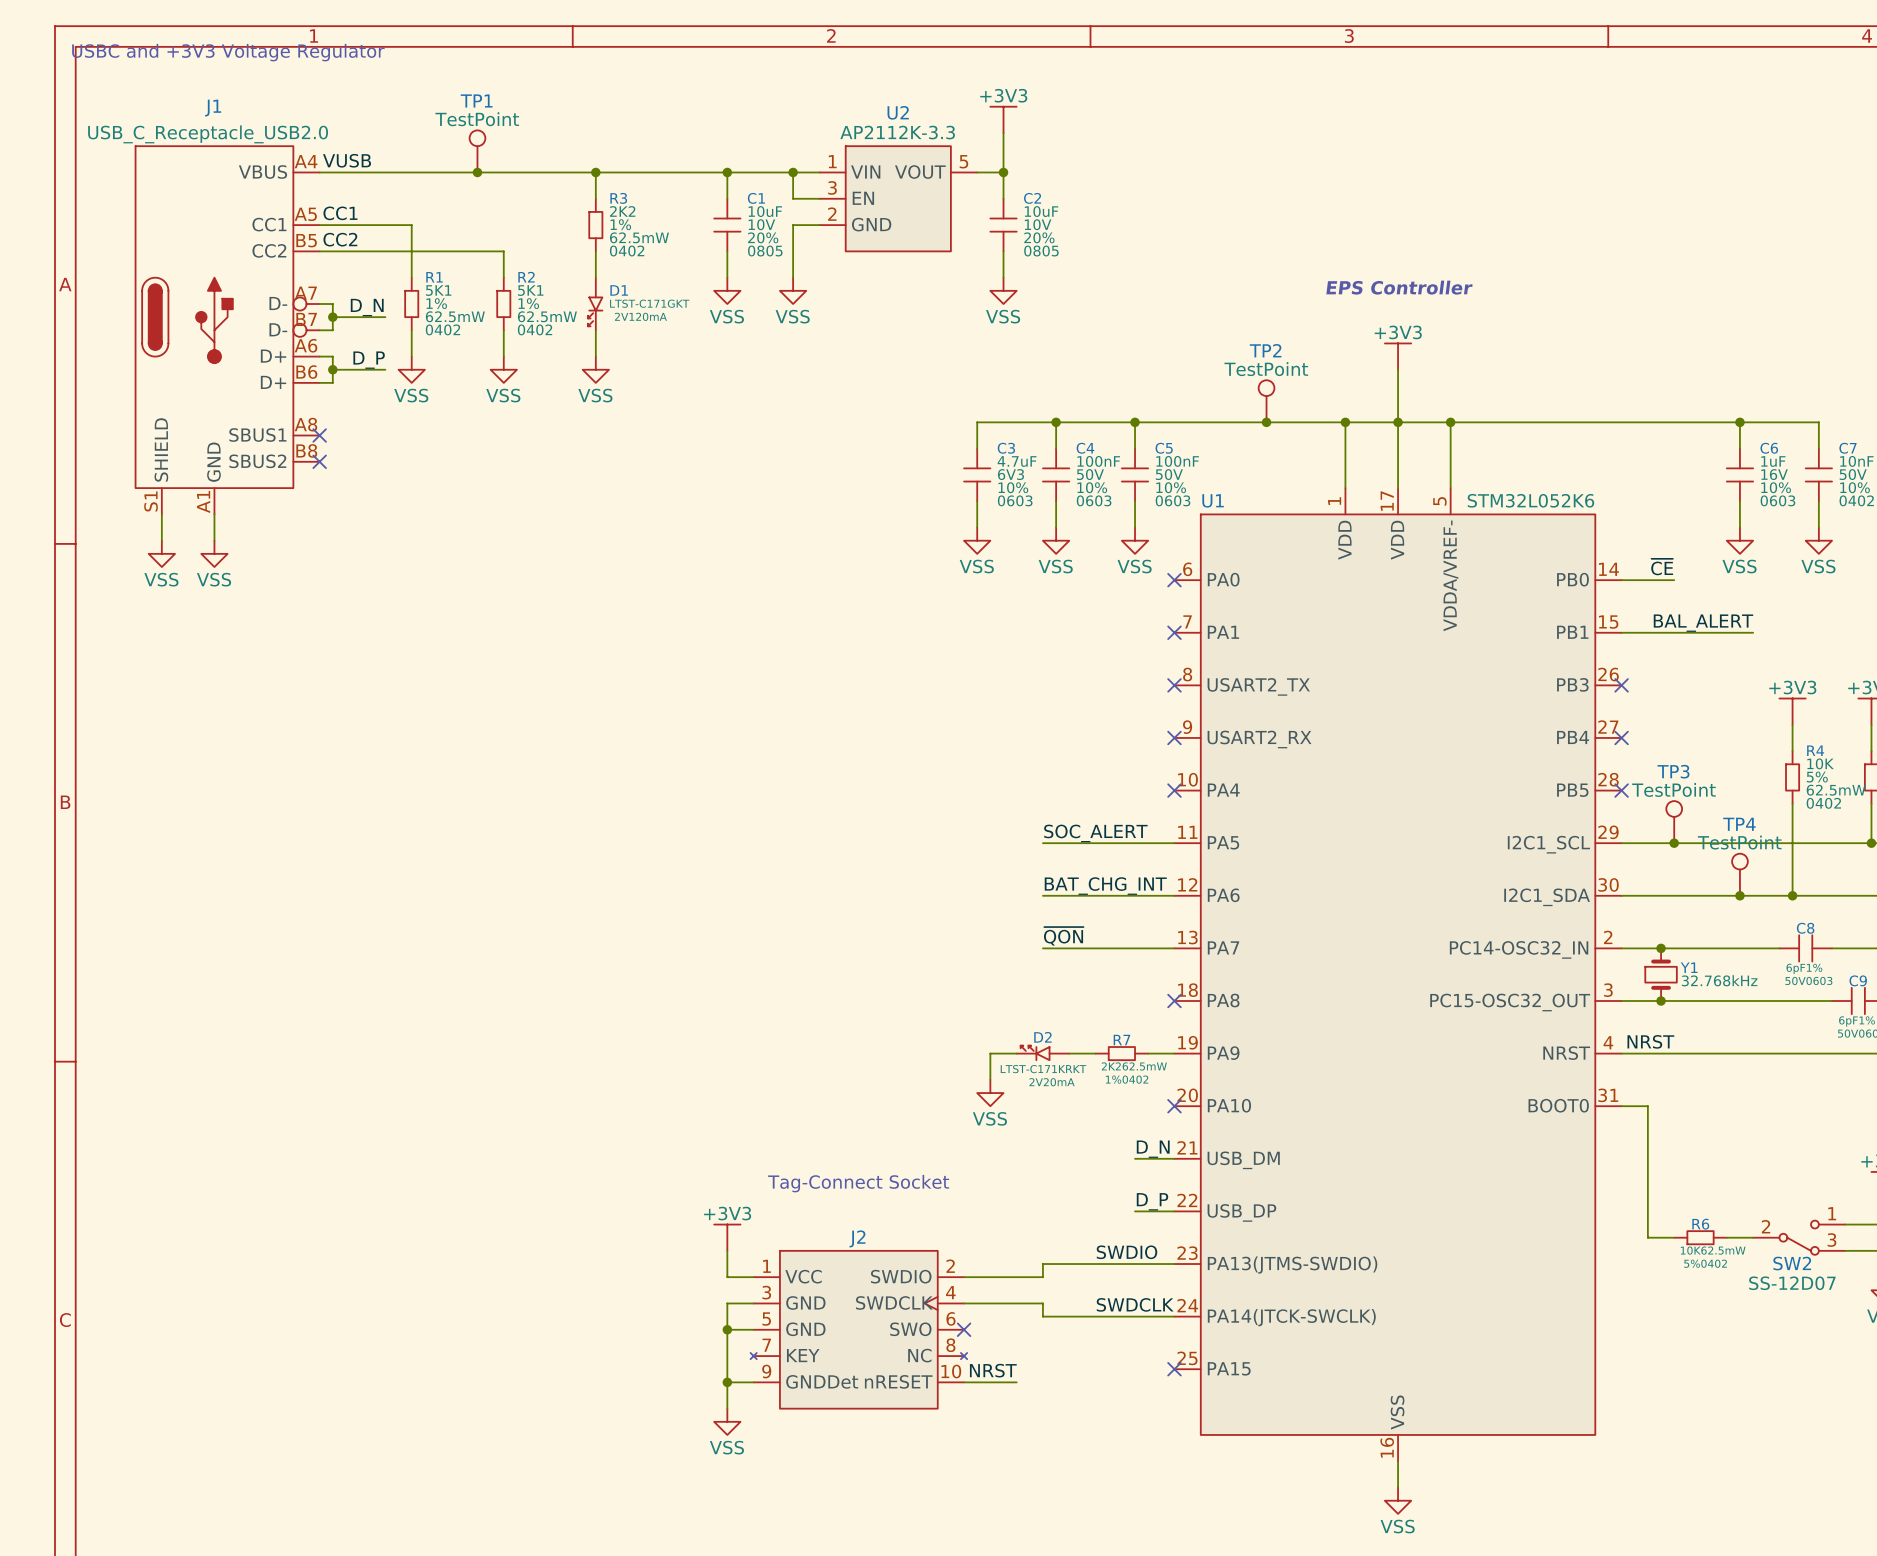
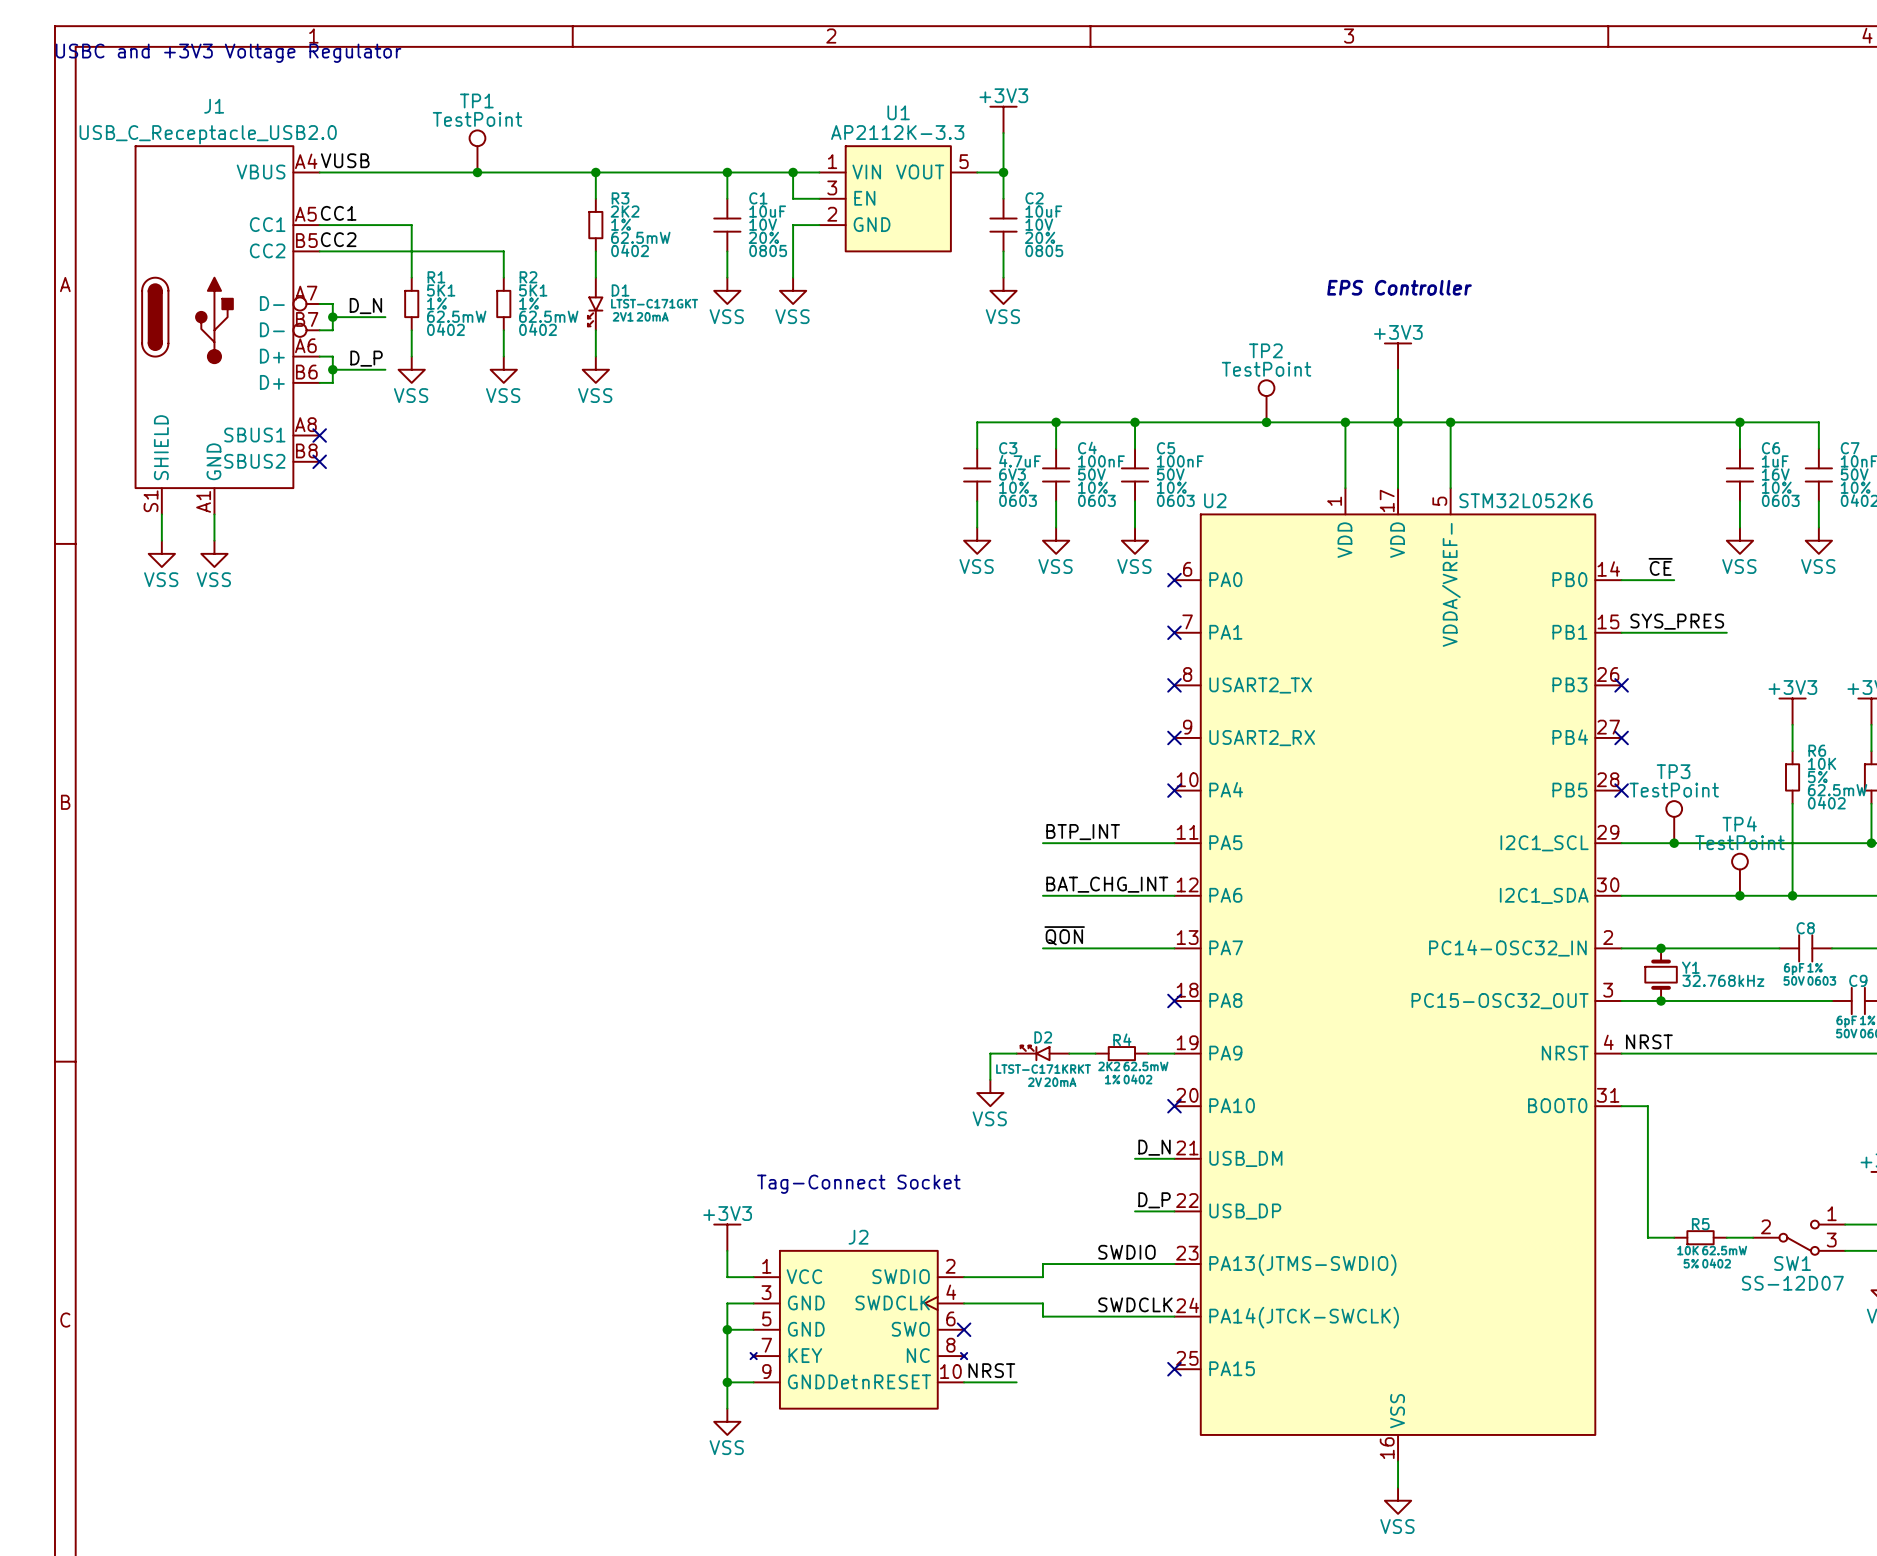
U2 name: U2 (898, 112) -> U1 (898, 112)
U1 name: U1 (1213, 500) -> U2 (1215, 500)
label: none -> SYS_PRES (1677, 621)
label: BAL_ALERT (1703, 623) -> none
wire: (1726, 632) (1753, 632) -> none
R4 name: R4 (1815, 750) -> R6 (1817, 750)
label: SOC_ALERT (1095, 833) -> BTP_INT (1083, 832)
R7 name: R7 (1121, 1040) -> R4 (1122, 1039)
R6 name: R6 (1700, 1224) -> R5 (1700, 1224)
SW2 name: SW2 (1792, 1263) -> SW1 (1792, 1263)

